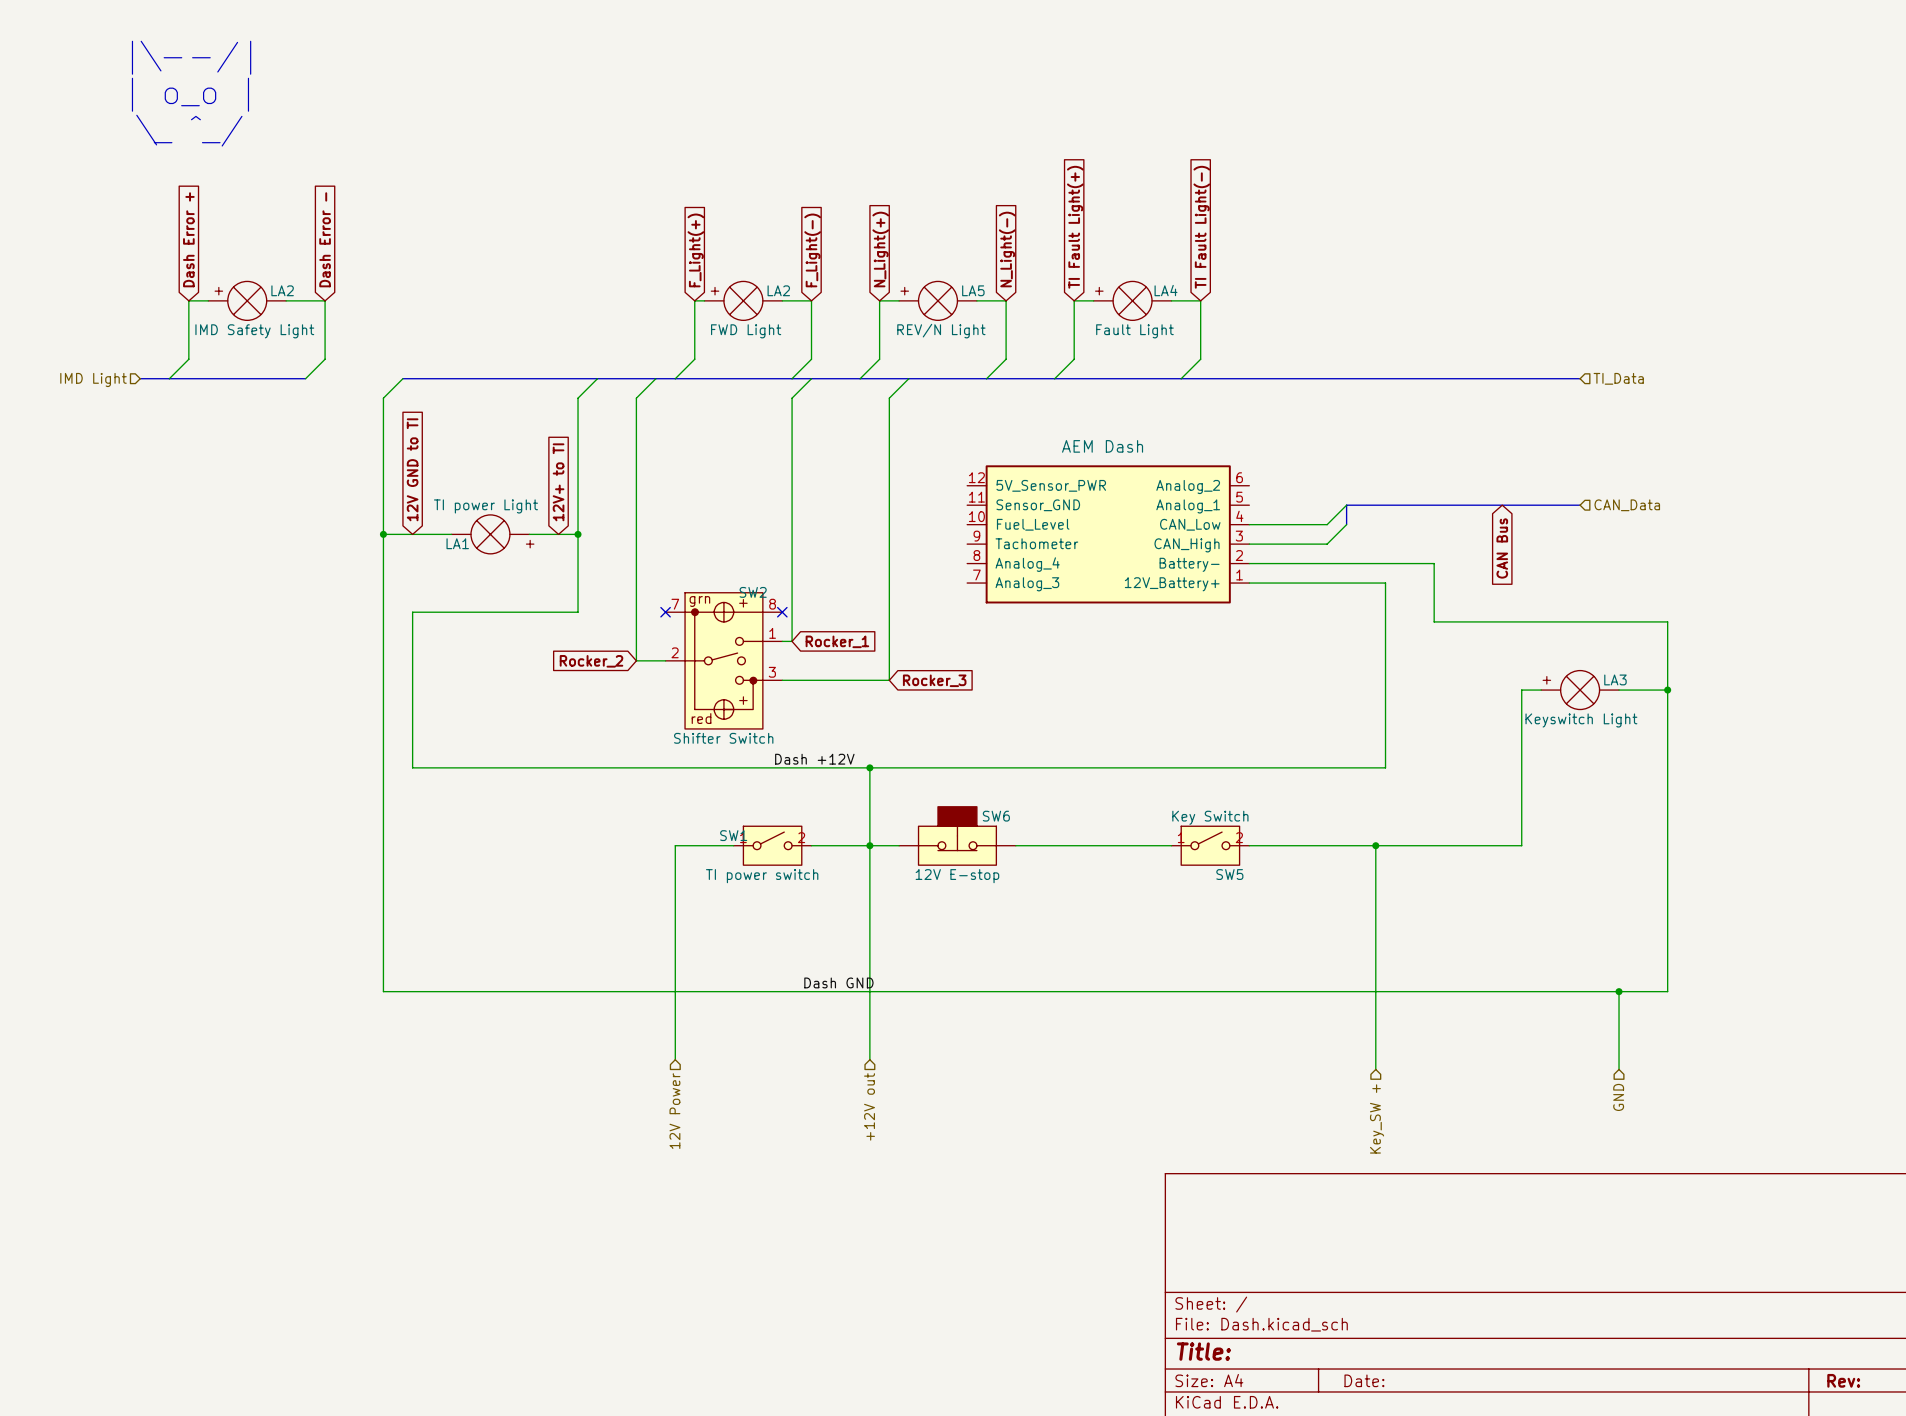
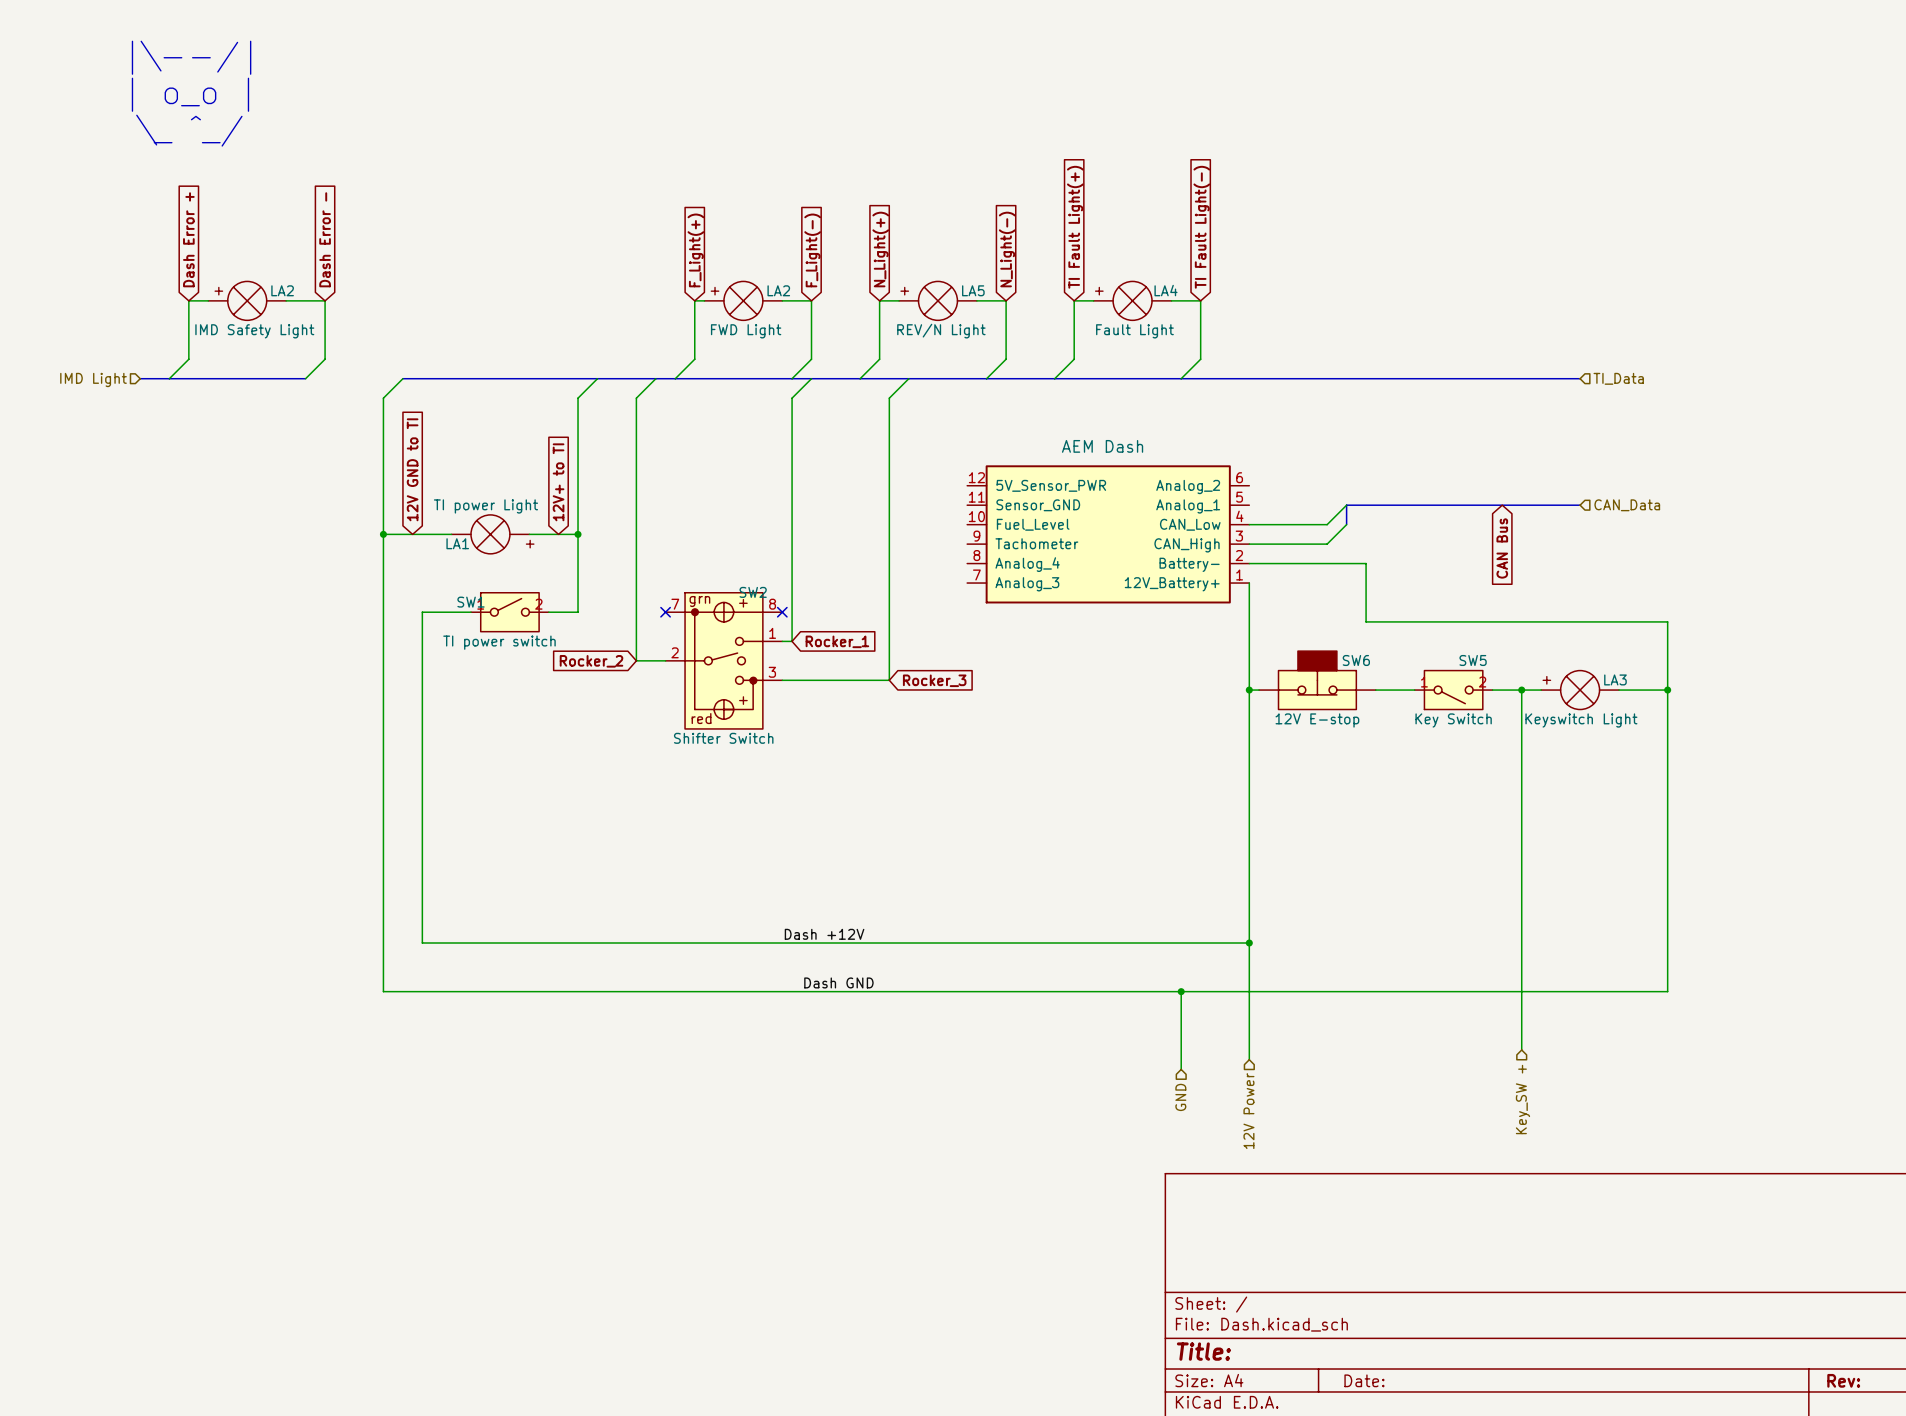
wire: (1366, 563) (1434, 563) (1434, 621) -> (1366, 563) (1366, 621) (1434, 621)
wire: (1249, 583) (1385, 583) (1385, 767) (412, 767) (412, 612) (422, 612) -> (1249, 943) (422, 943) (422, 612)
wire: none -> (1249, 583) (1249, 1059)
wire: none -> (1249, 690) (1259, 690)
junction: none -> (1249, 690)
wire: none -> (1375, 690) (1414, 690)
wire: none -> (1492, 690) (1521, 690)
junction: none -> (1521, 690)
label position: Dash +12V (814, 759) -> Dash +12V (824, 934)
wire: (869, 767) (869, 1059) -> none
junction: (869, 767) -> none
SW6 position: (957, 835) -> (1317, 680)
wire: (733, 845) (675, 845) (675, 1059) -> none
SW1 position: (772, 845) -> (509, 612)
wire: (811, 845) (899, 845) -> none
junction: (869, 845) -> none
wire: (1015, 845) (1171, 845) -> none
SW5 flip: as is (1210, 845) -> up-down (1453, 690)
SW5 position: (1210, 845) -> (1453, 690)
wire: (1249, 845) (1521, 845) -> (1521, 1050) (1521, 845)
wire: (1375, 845) (1375, 1069) -> none
junction: (1375, 845) -> none
junction: none -> (1249, 943)
wire: none -> (1181, 991) (1181, 1069)
junction: none -> (1181, 991)
wire: (1619, 991) (1619, 1069) -> none
junction: (1619, 991) -> none
hierarchical label: none -> GND (1180, 1097)
hierarchical label: GND (1618, 1097) -> none
hierarchical label: +12V out (869, 1106) -> none
hierarchical label: 12V Power (674, 1111) -> none
hierarchical label: none -> 12V Power (1248, 1111)
hierarchical label position: Key_SW + (1377, 1118) -> Key_SW + (1522, 1099)

